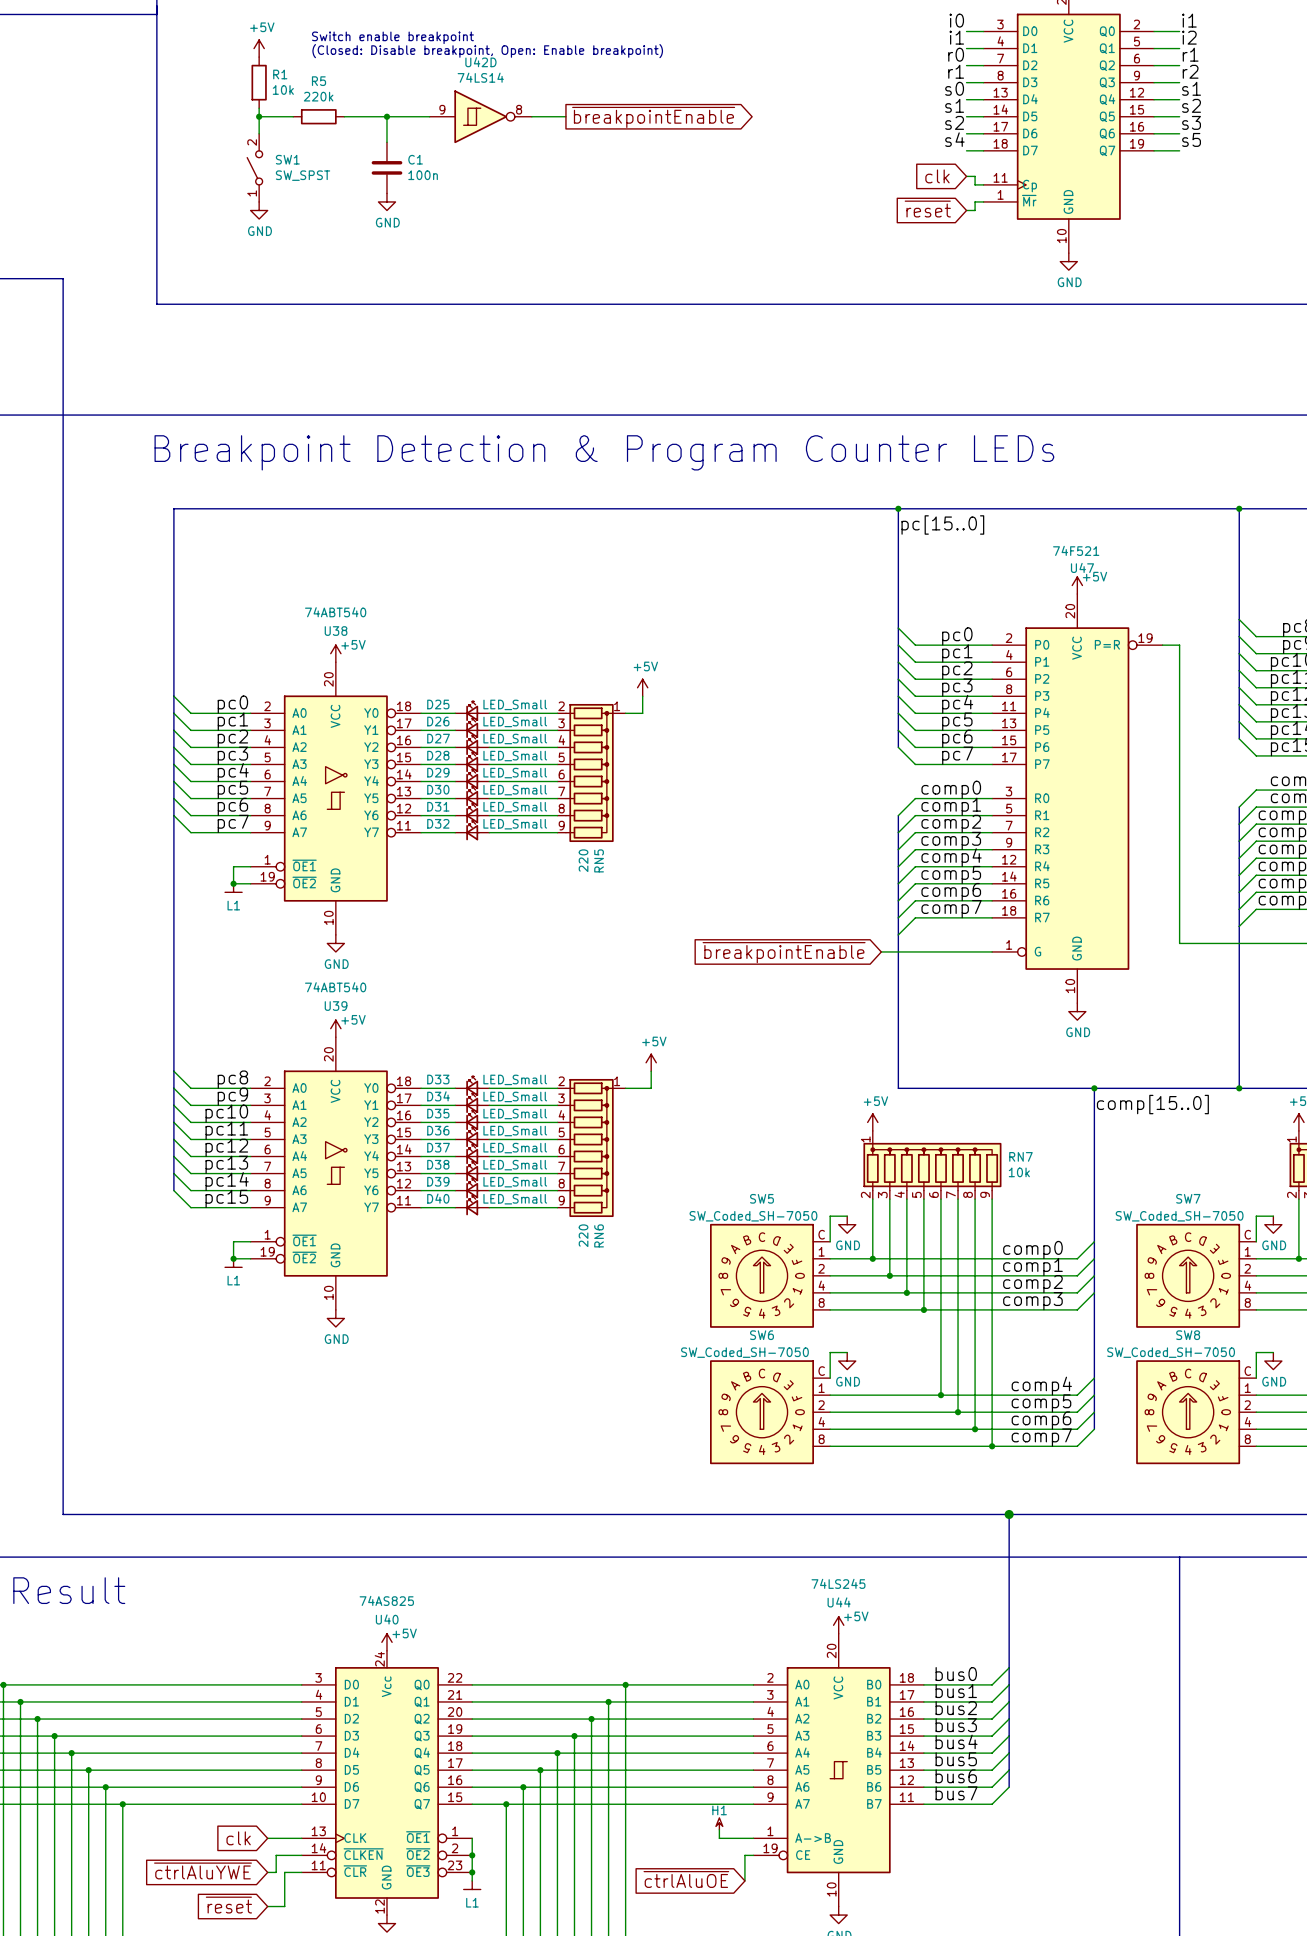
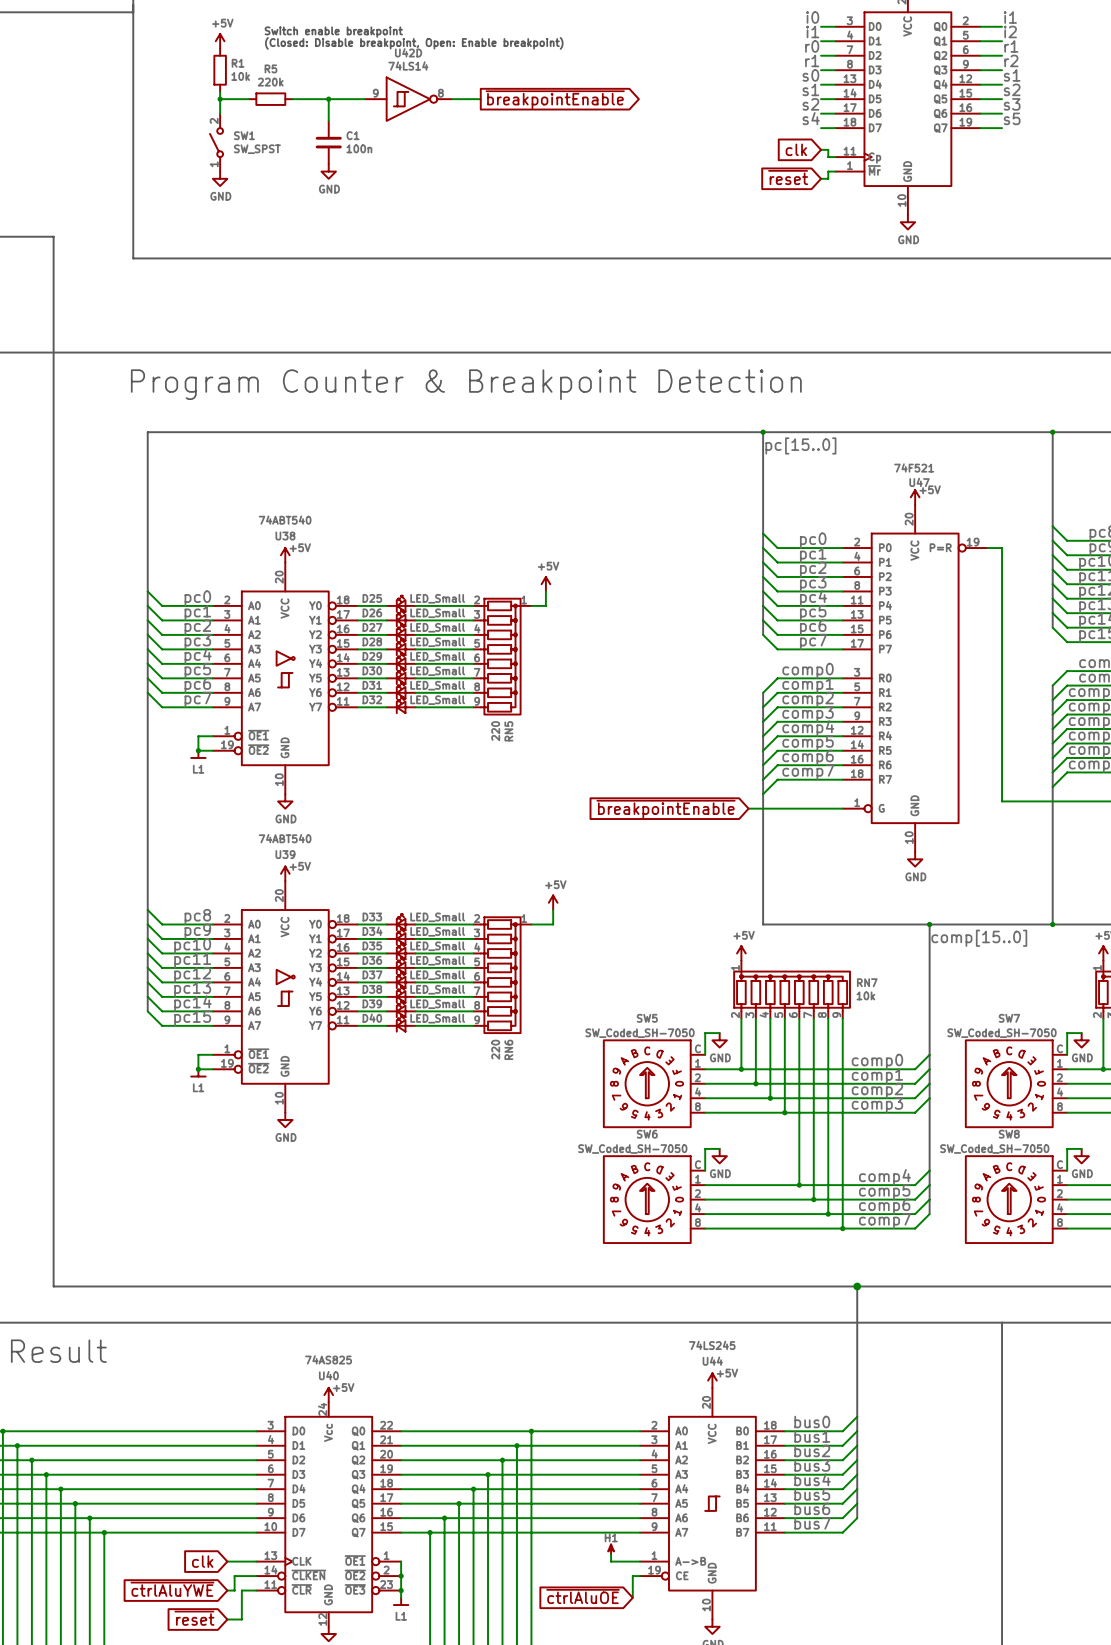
text: Breakpoint Detection & Program Counter LEDs (604, 452) -> Program Counter & Breakpoint Detection (466, 384)

